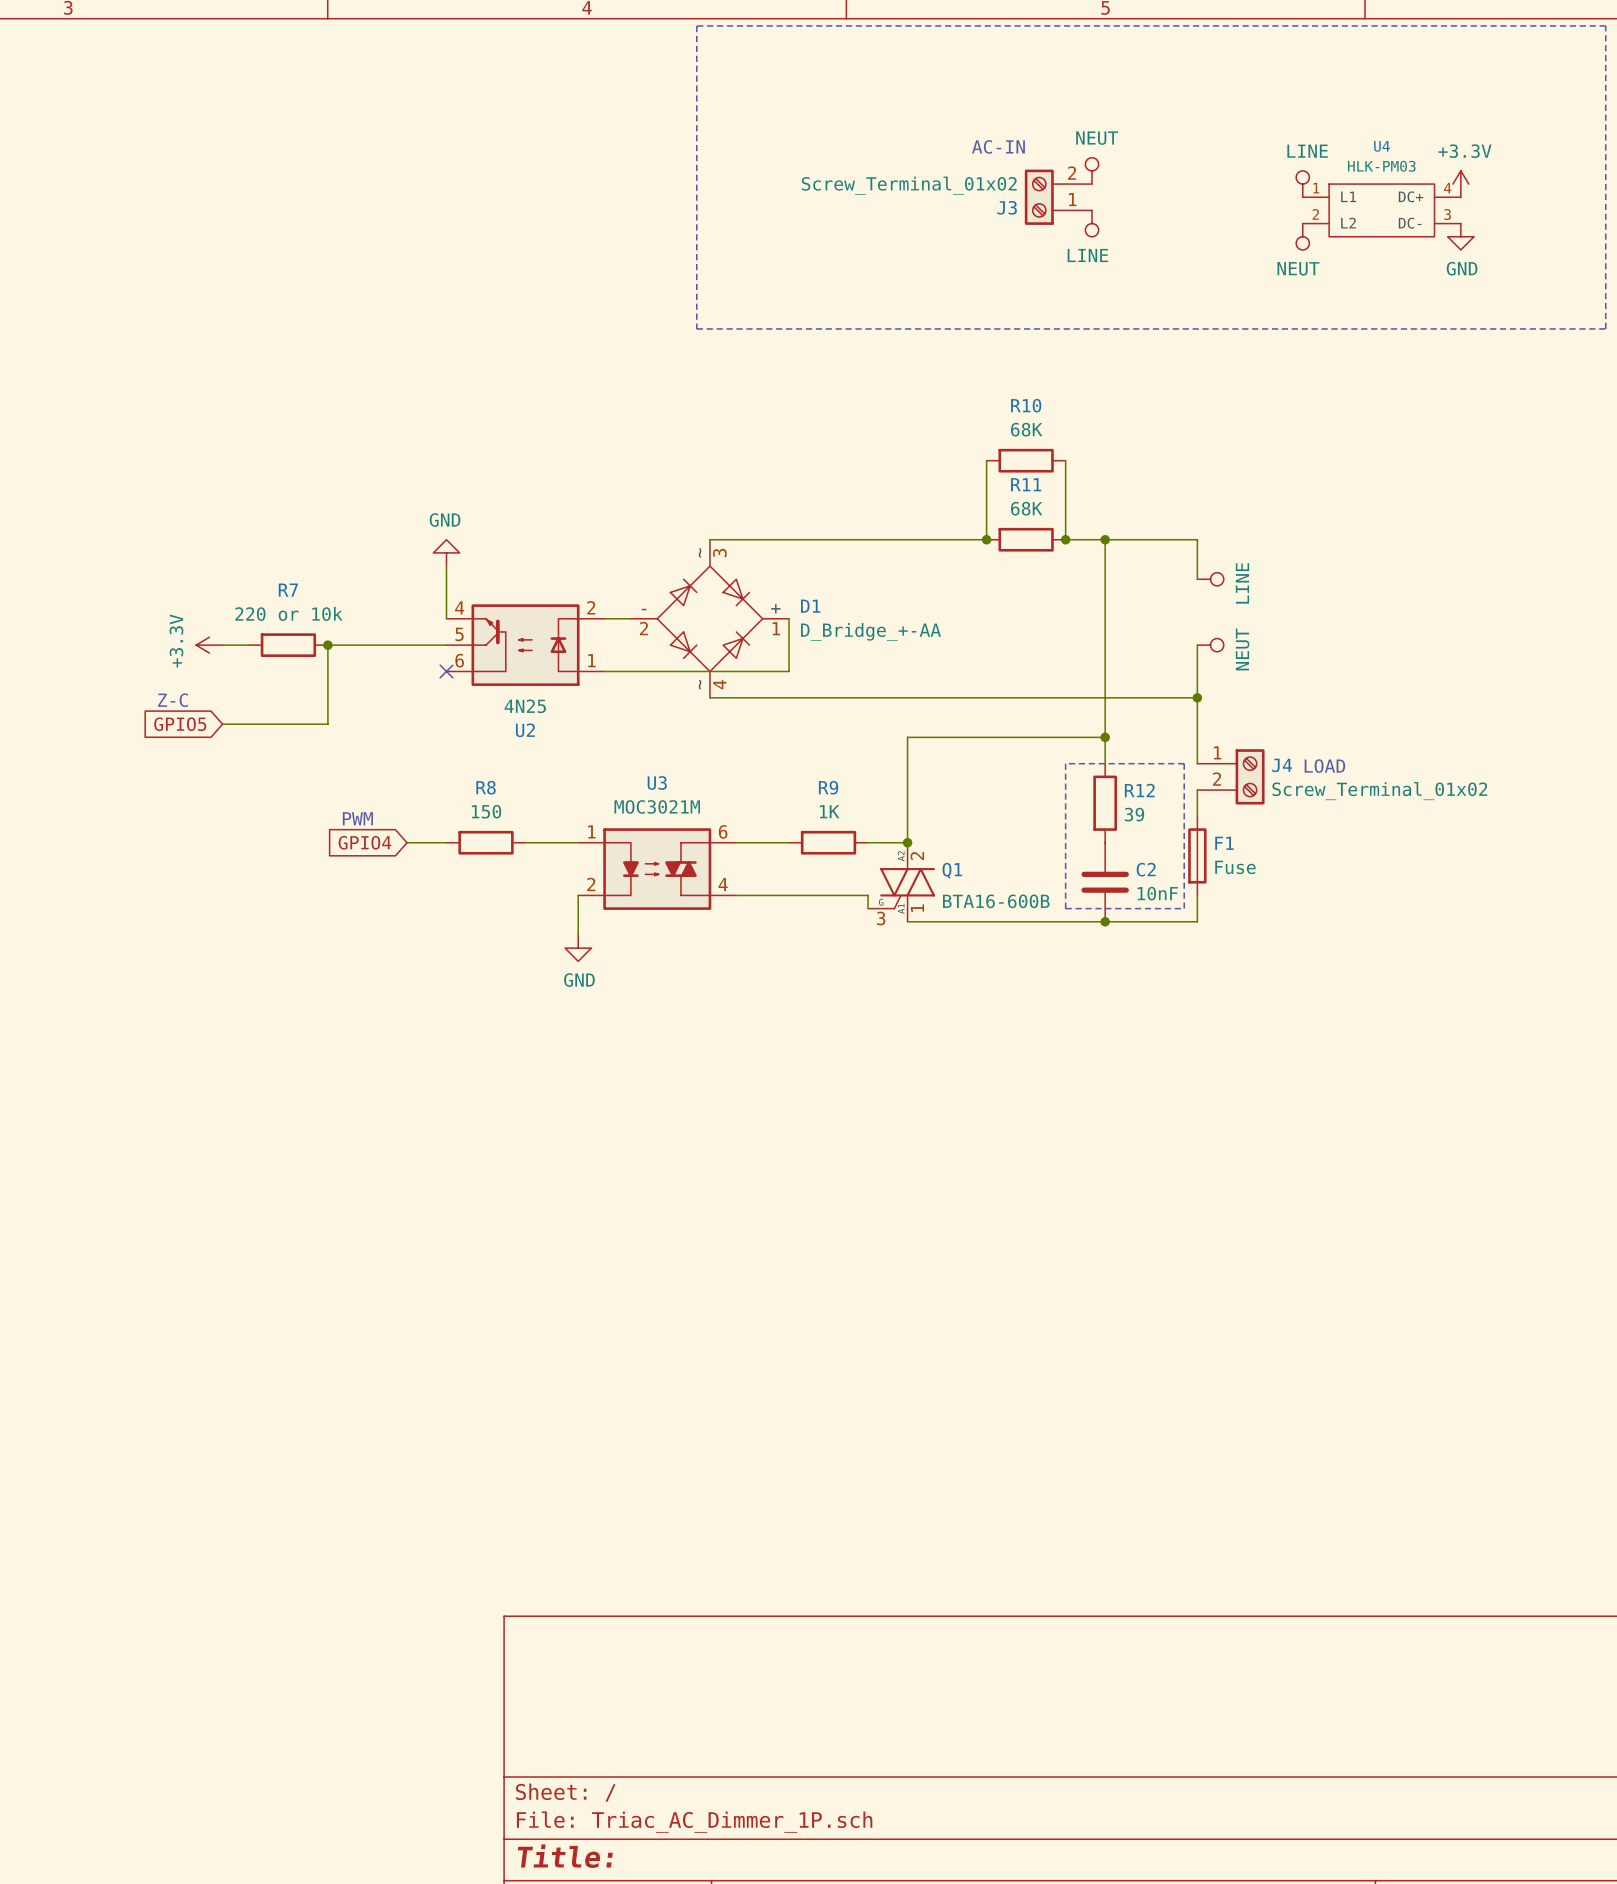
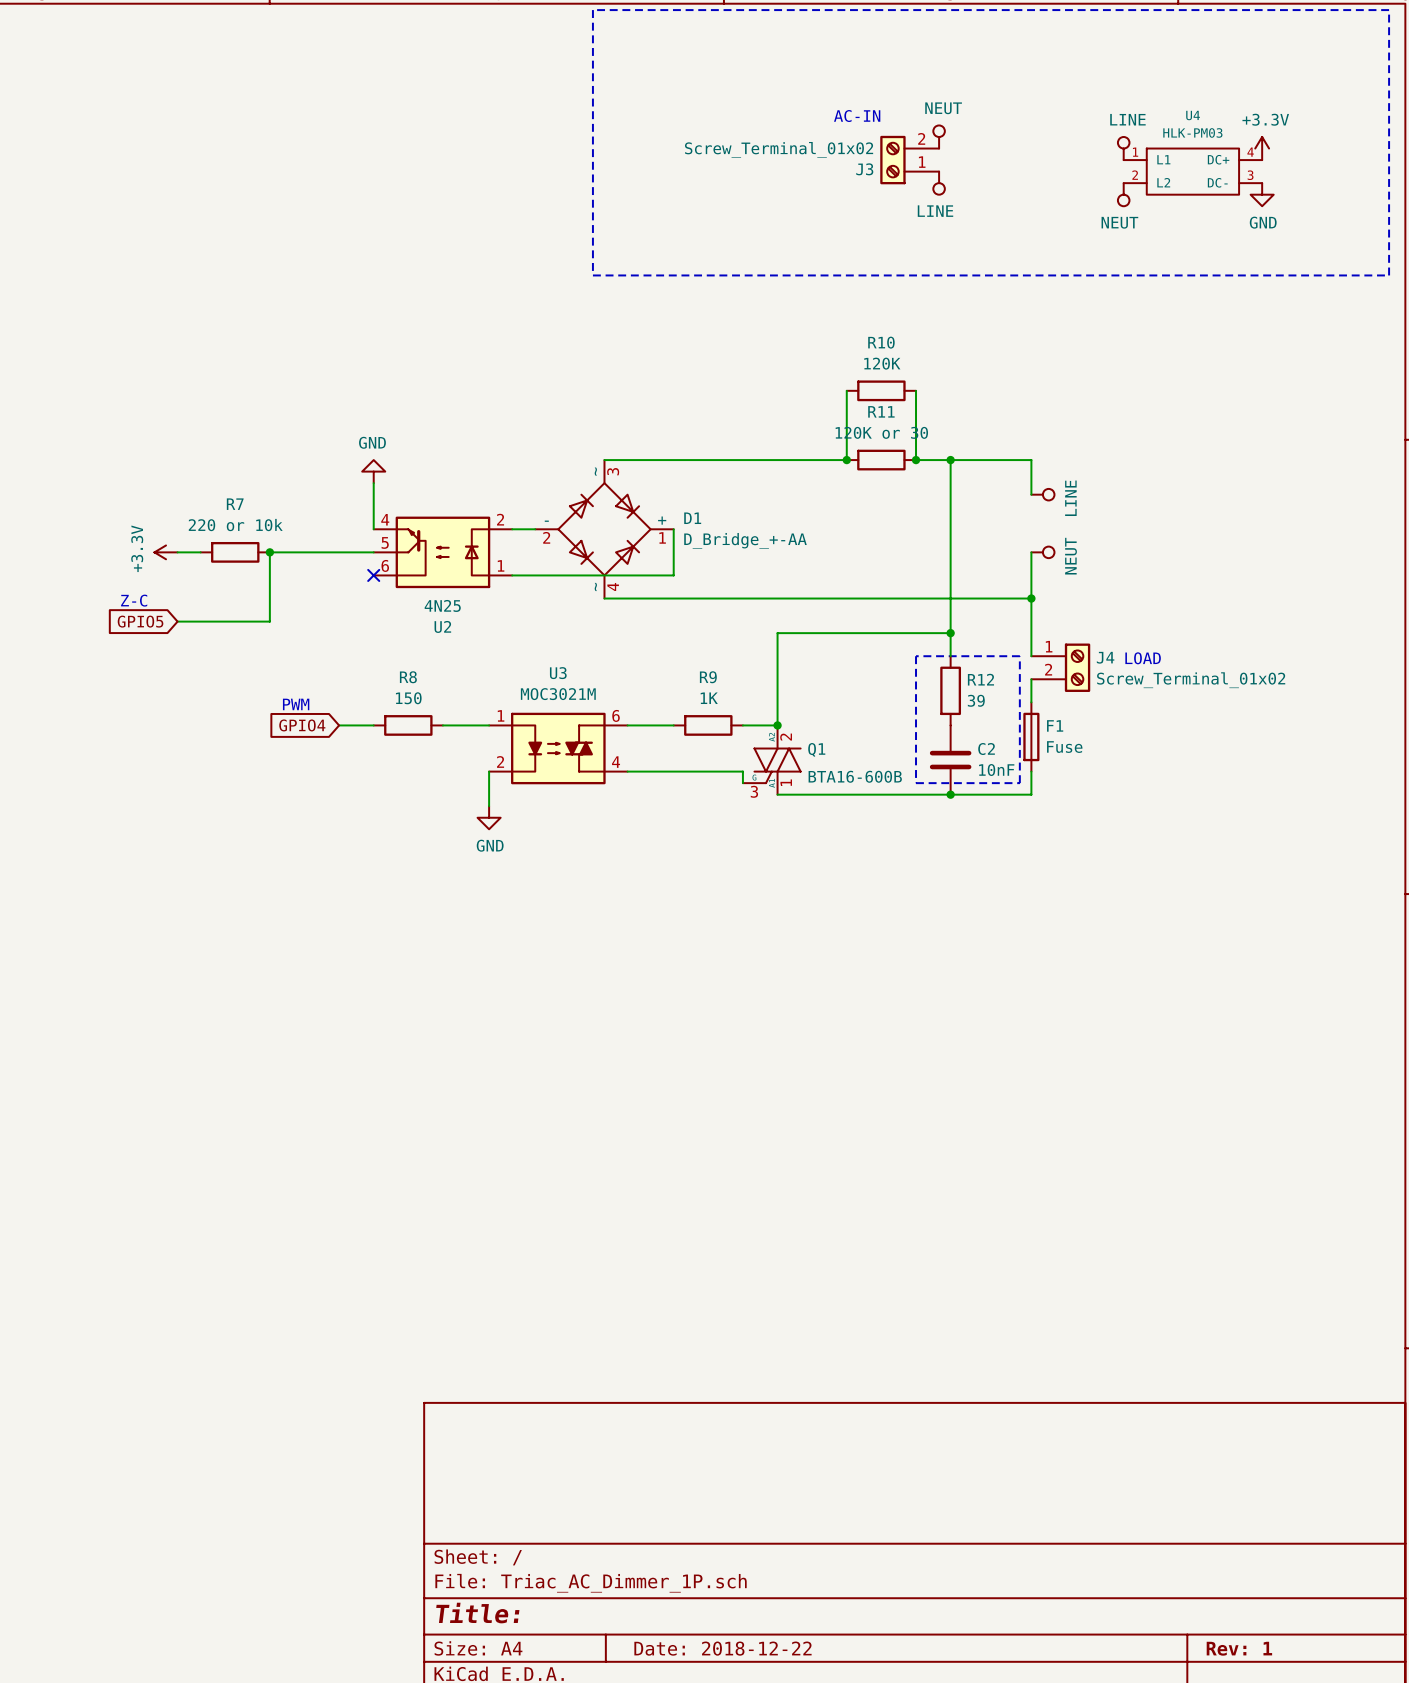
R10 value: 68K (1026, 429) -> 120K (882, 363)
R11 value: 68K (1026, 508) -> 120K or 30 (881, 432)

